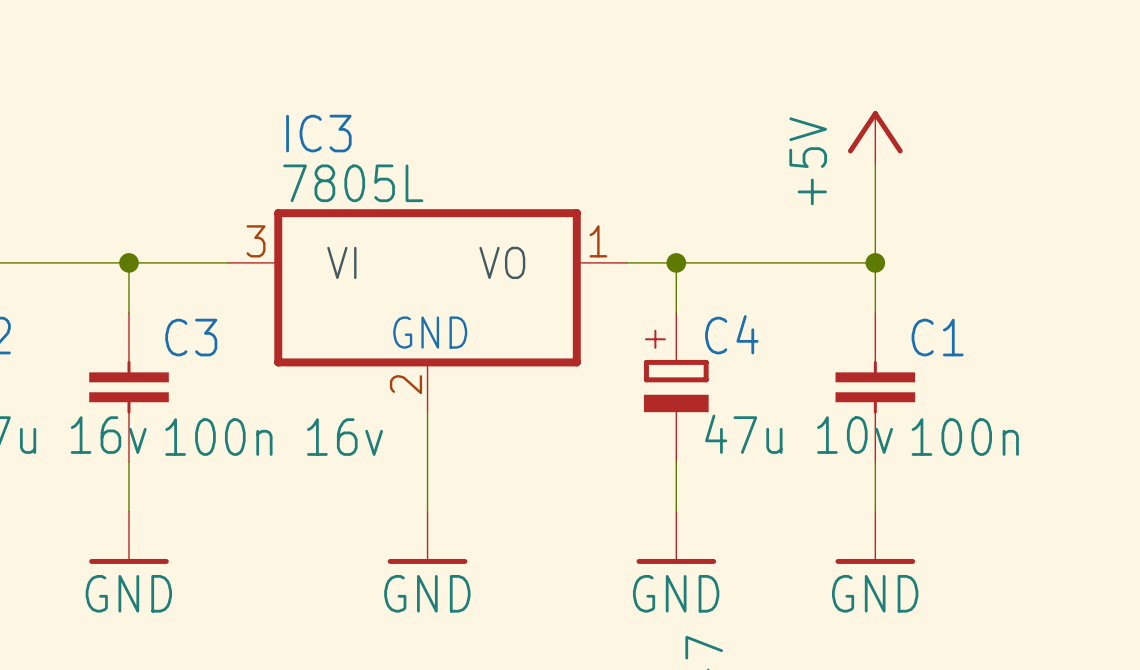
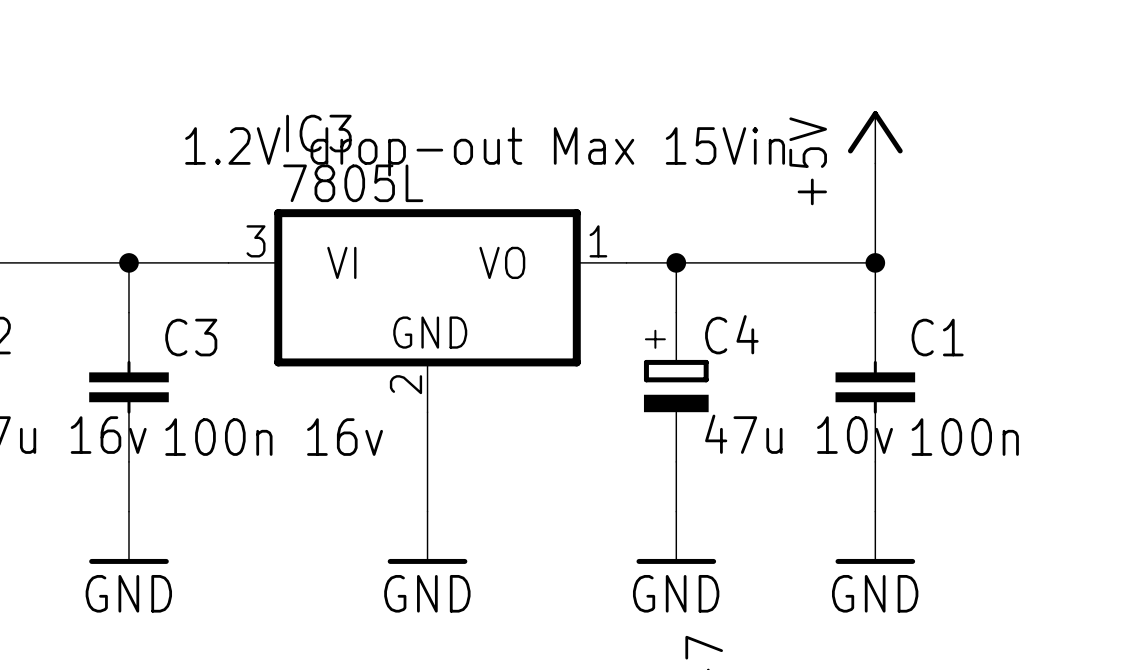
text: none -> 1.2V drop-out Max 15Vin (485, 151)

